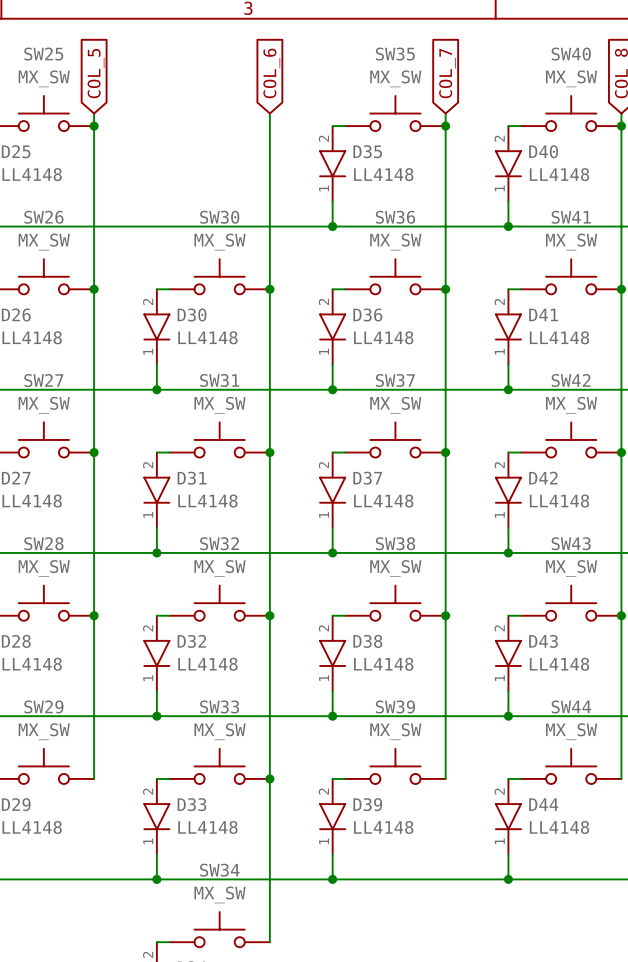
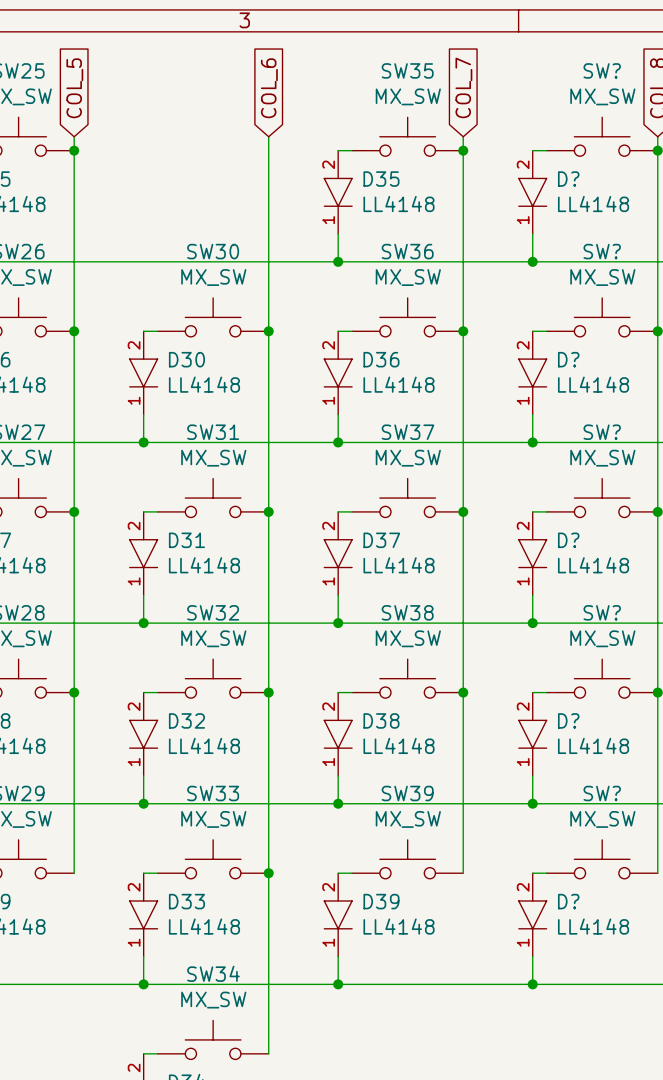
SW40 name: SW40 (571, 54) -> SW? (602, 70)
D40 name: D40 (543, 151) -> D? (568, 179)
SW41 name: SW41 (571, 217) -> SW? (602, 251)
D41 name: D41 (543, 314) -> D? (568, 359)
SW42 name: SW42 (571, 380) -> SW? (602, 432)
D42 name: D42 (543, 478) -> D? (568, 540)
SW43 name: SW43 (571, 543) -> SW? (602, 612)
D43 name: D43 (543, 641) -> D? (568, 720)
SW44 name: SW44 (571, 706) -> SW? (602, 793)
D44 name: D44 (543, 804) -> D? (568, 901)

